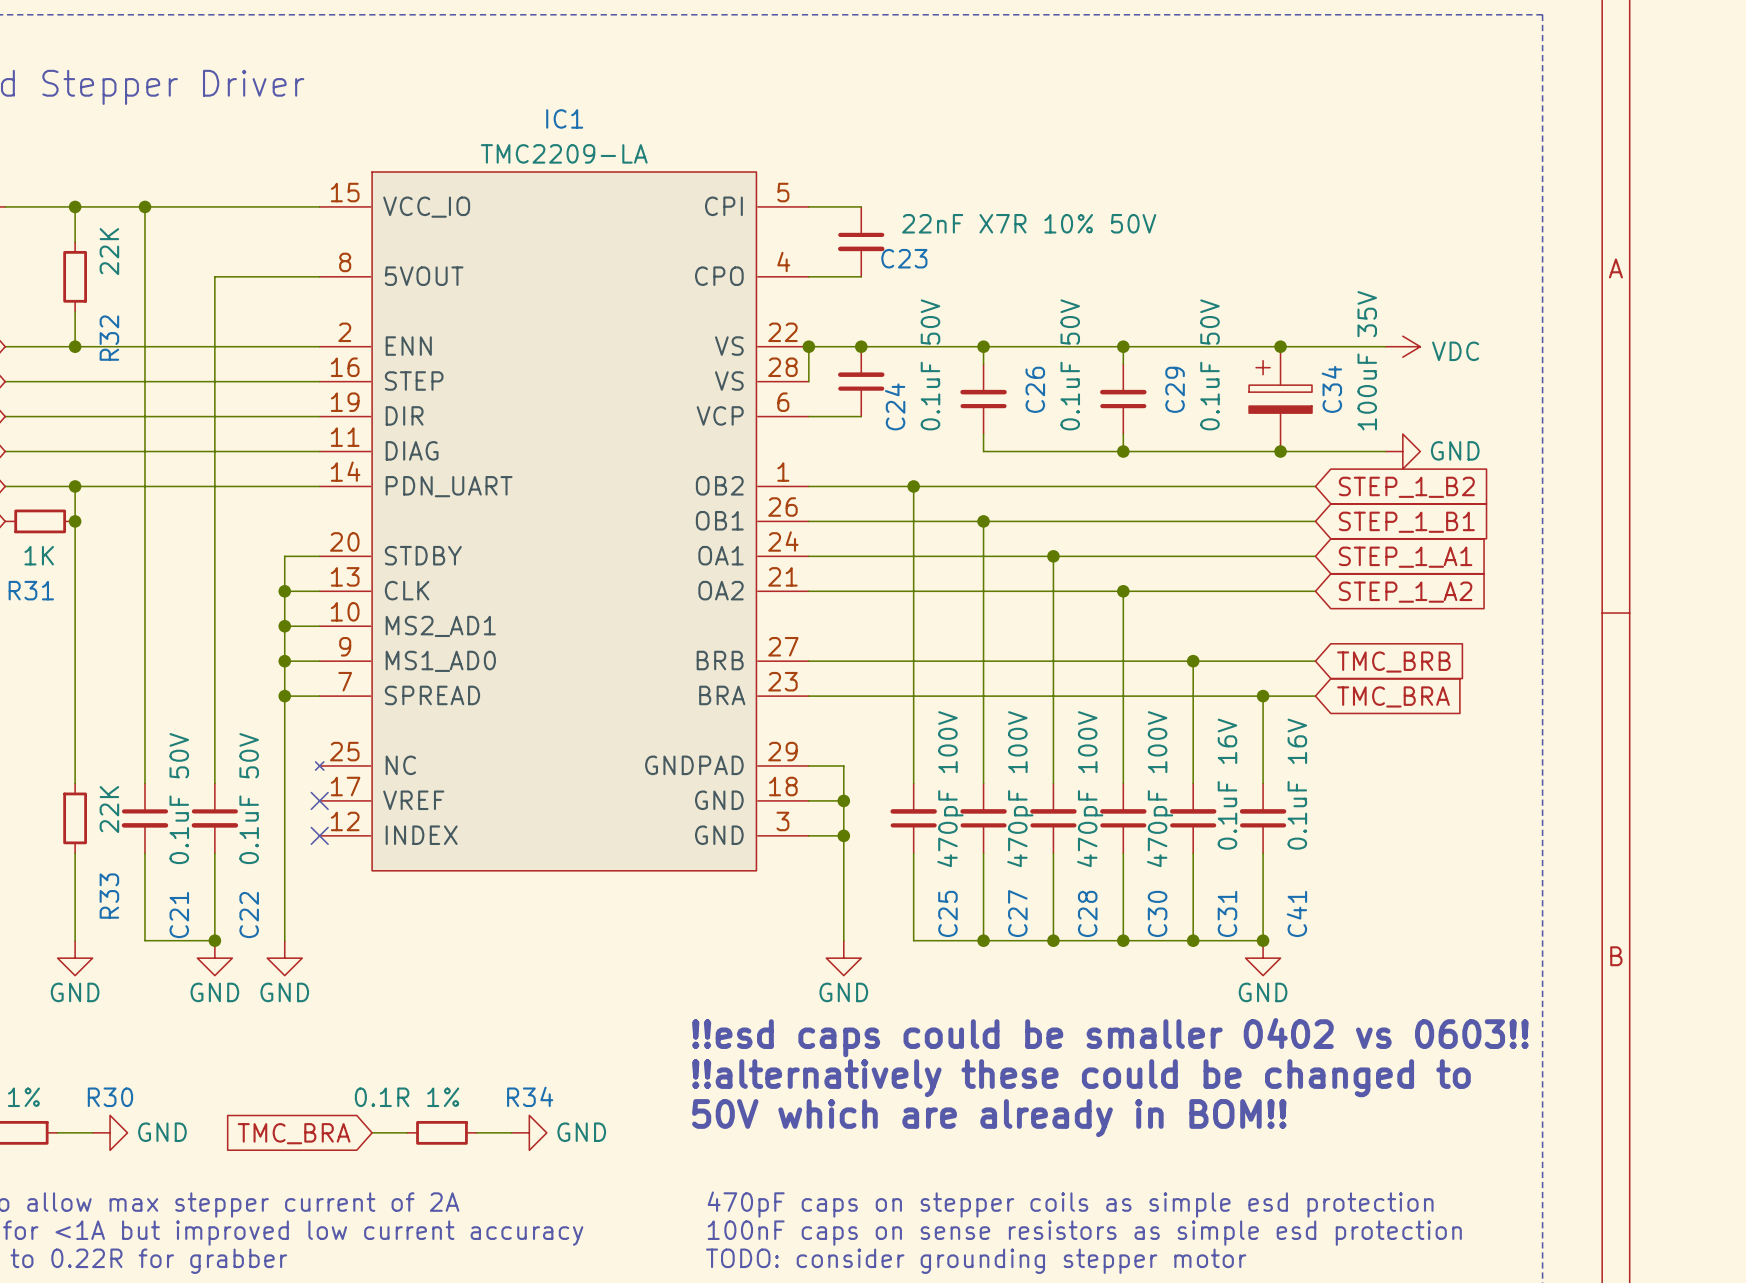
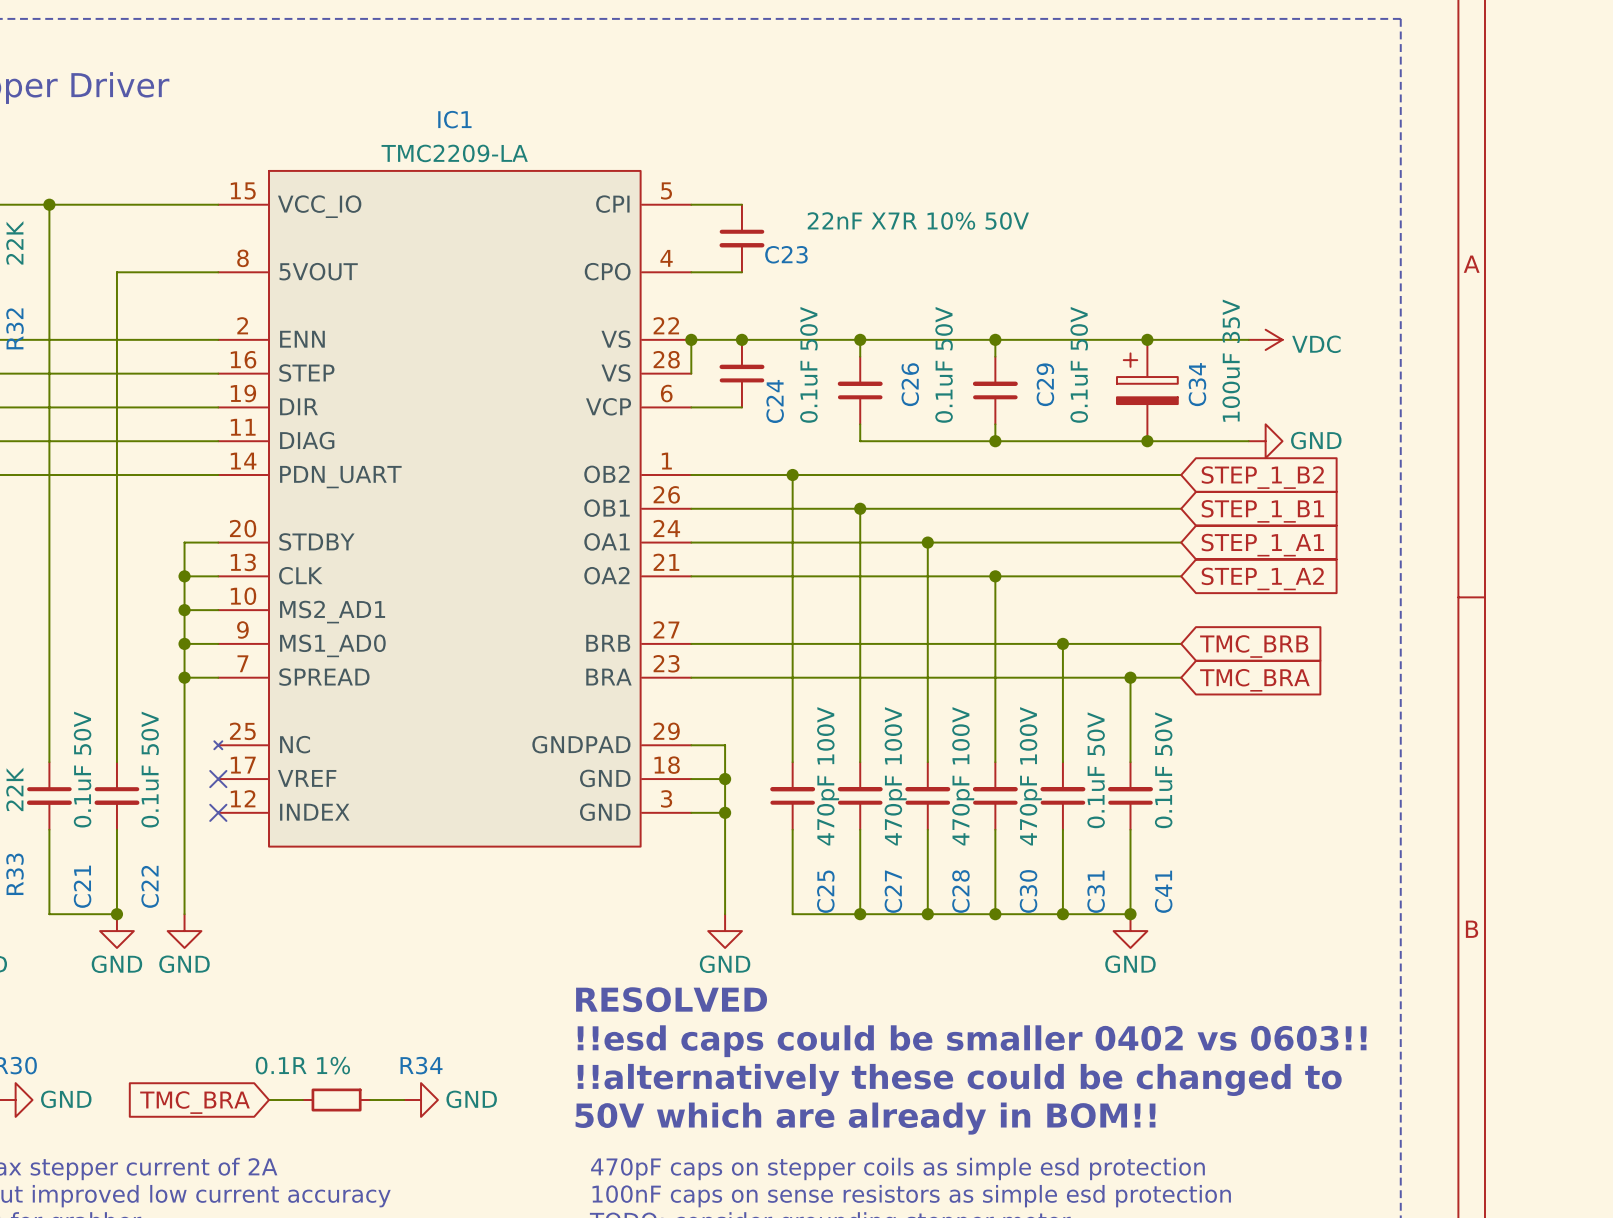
C31 value: 0.1uF 16V (1227, 784) -> 0.1uF 50V (1096, 770)
C41 value: 0.1uF 16V (1297, 784) -> 0.1uF 50V (1163, 770)
text: !!esd caps could be smaller 0402 vs 0603!! (1110, 1037) -> RESOLVED (671, 999)
text: !!alternatively these could be changed to (1081, 1078) -> !!esd caps could be smaller 0402 vs 0603!! (972, 1041)
text: 50V which are already in BOM!! (989, 1118) -> !!alternatively these could be changed to (959, 1079)
text: none -> 50V which are already in BOM!! (865, 1118)

